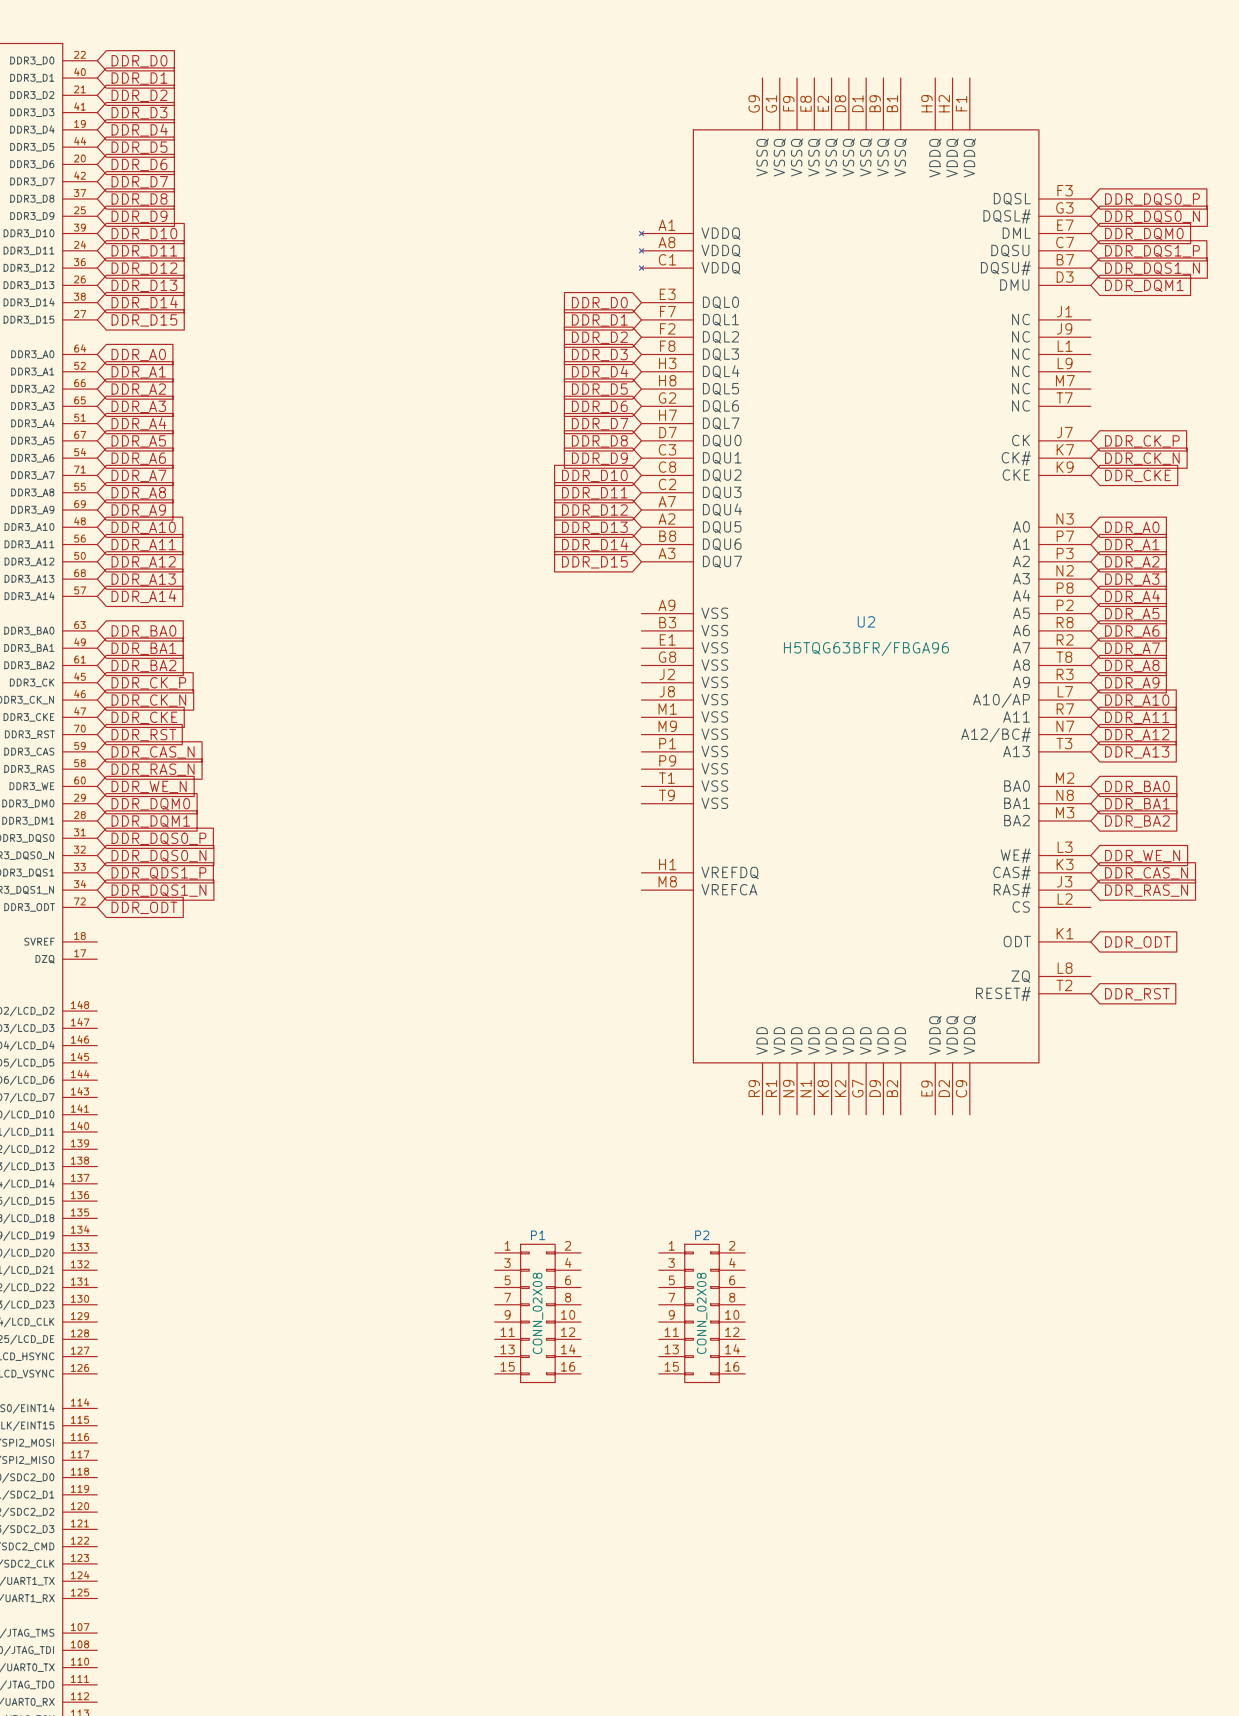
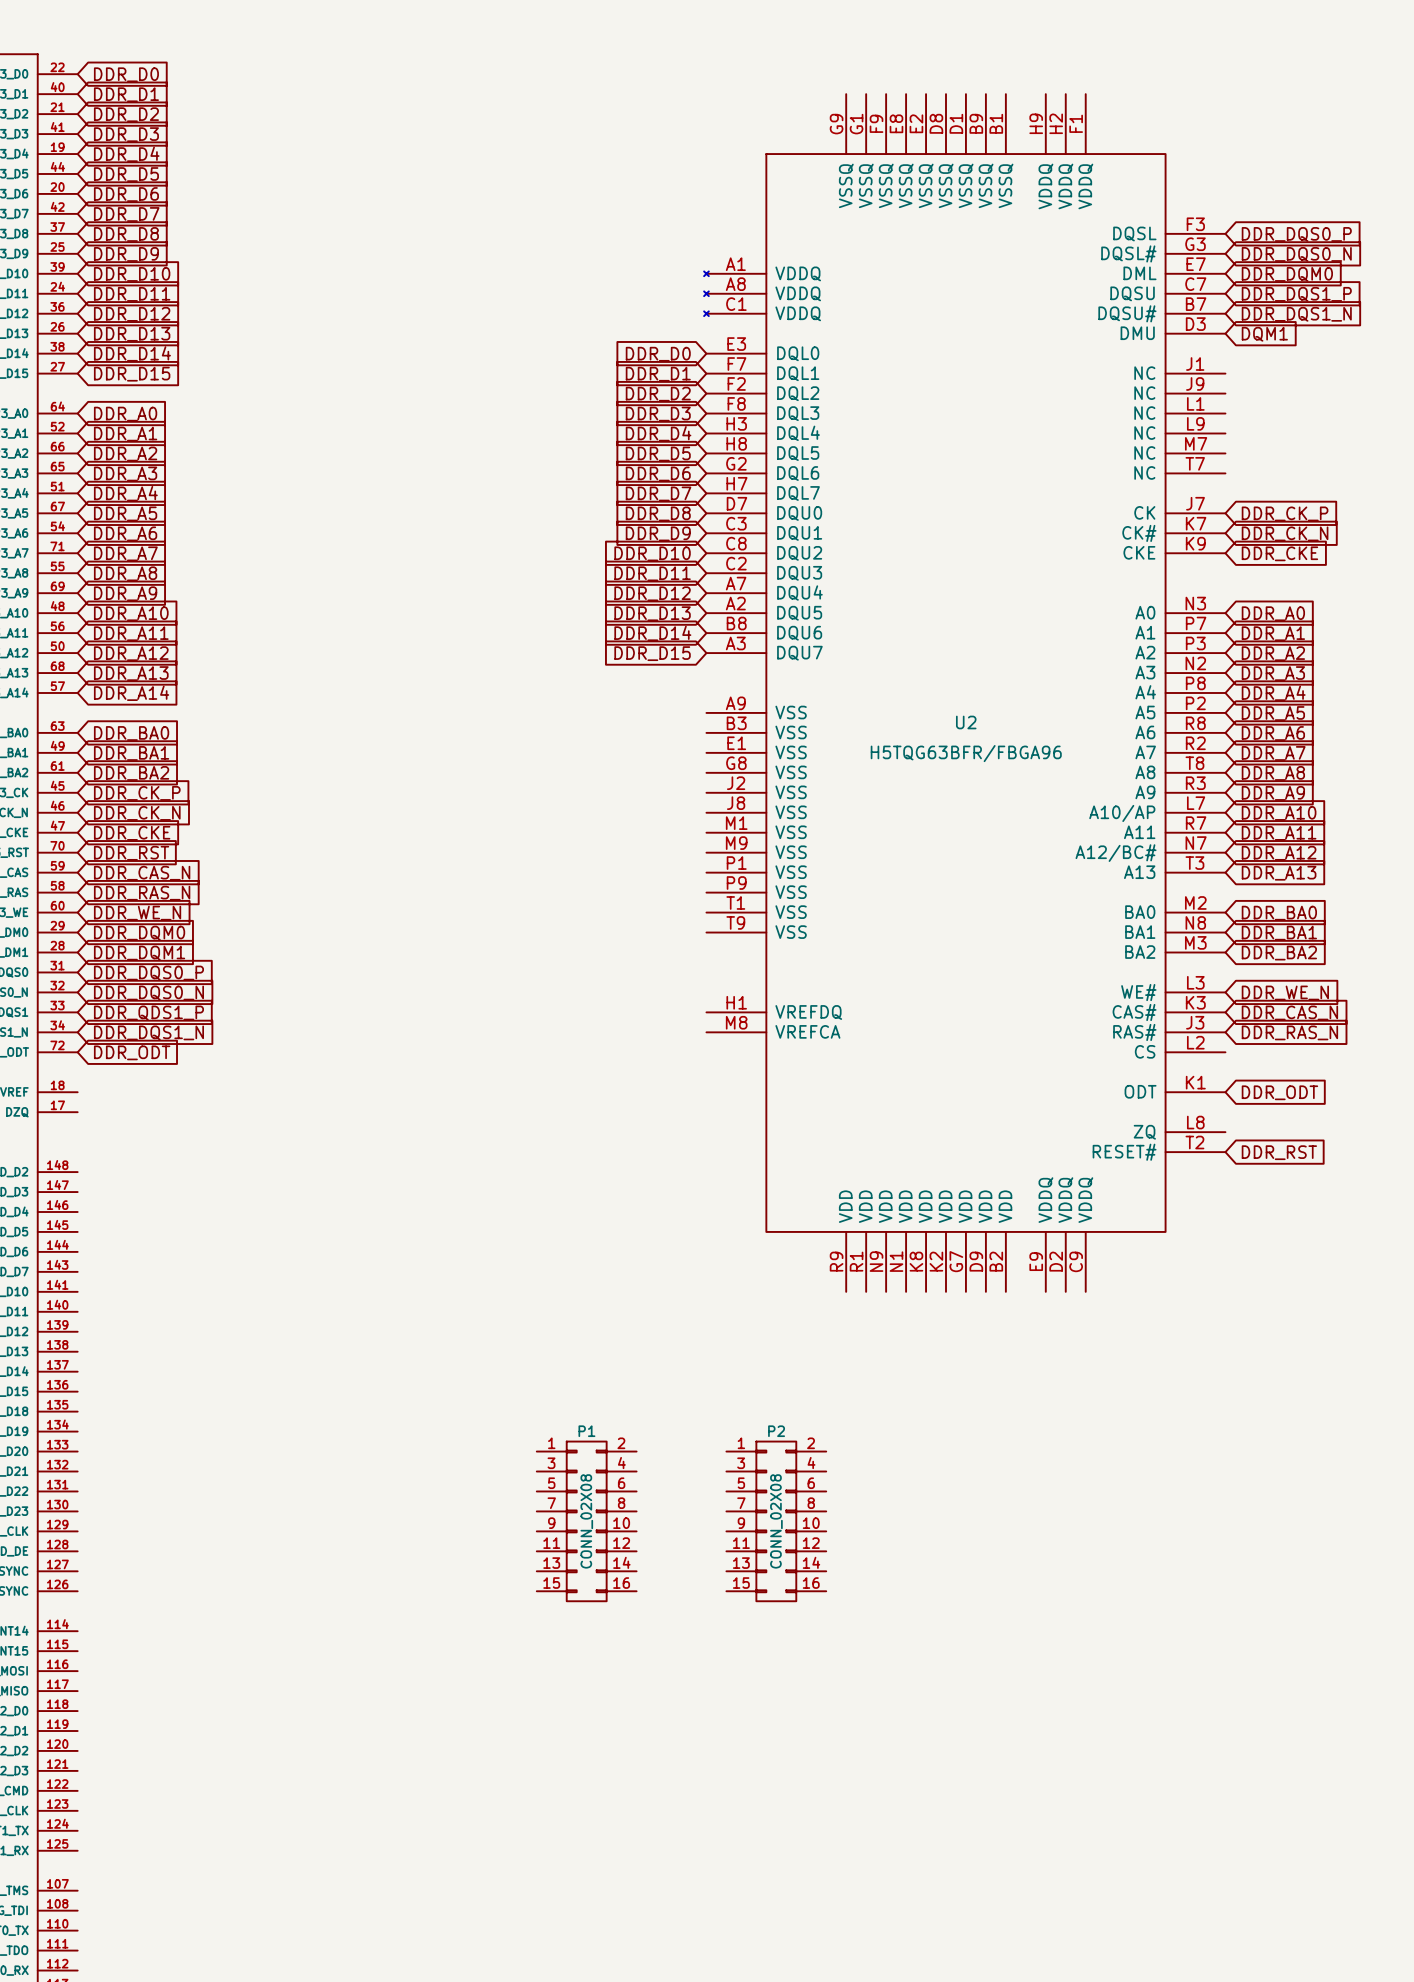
global label: DDR_DQM1 (1144, 285) -> DQM1 (1264, 334)

